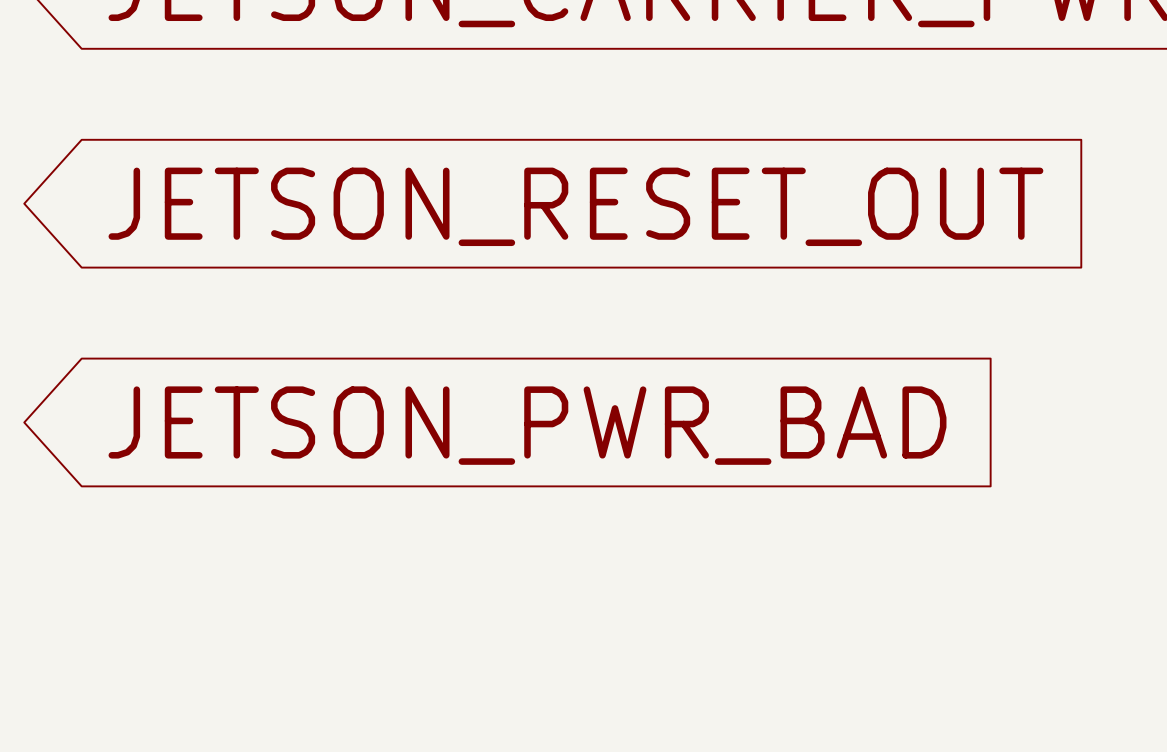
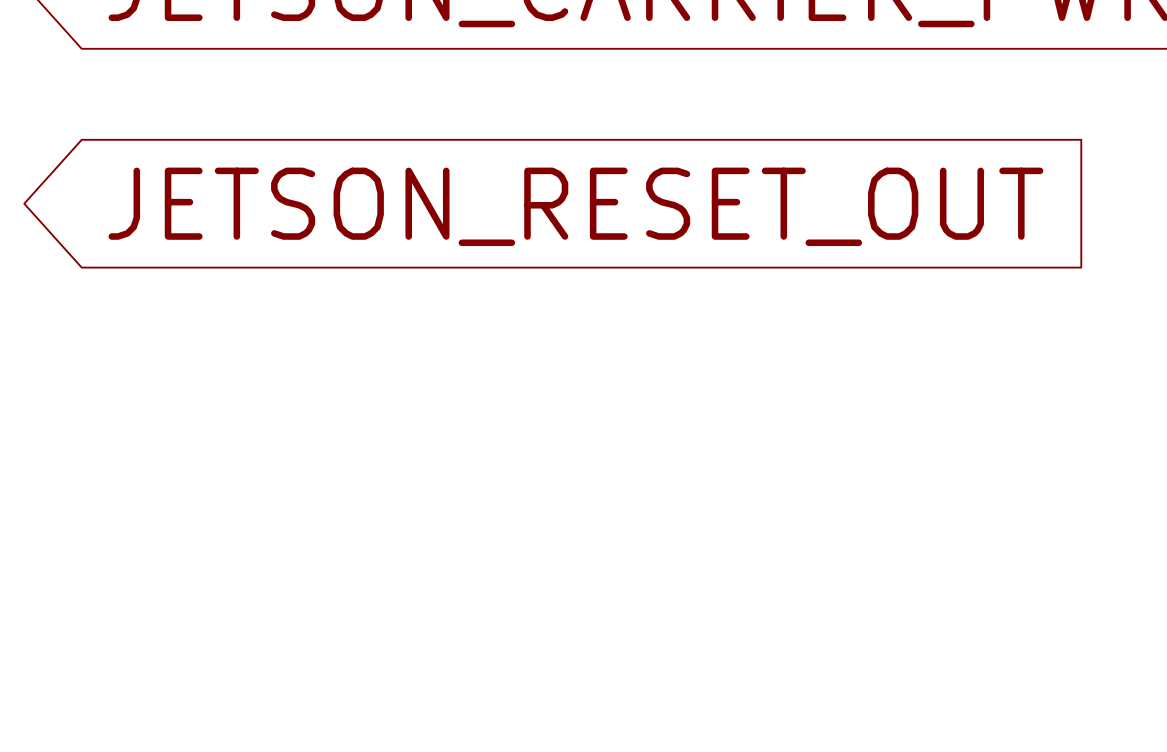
global label: JETSON_PWR_BAD (527, 425) -> none

